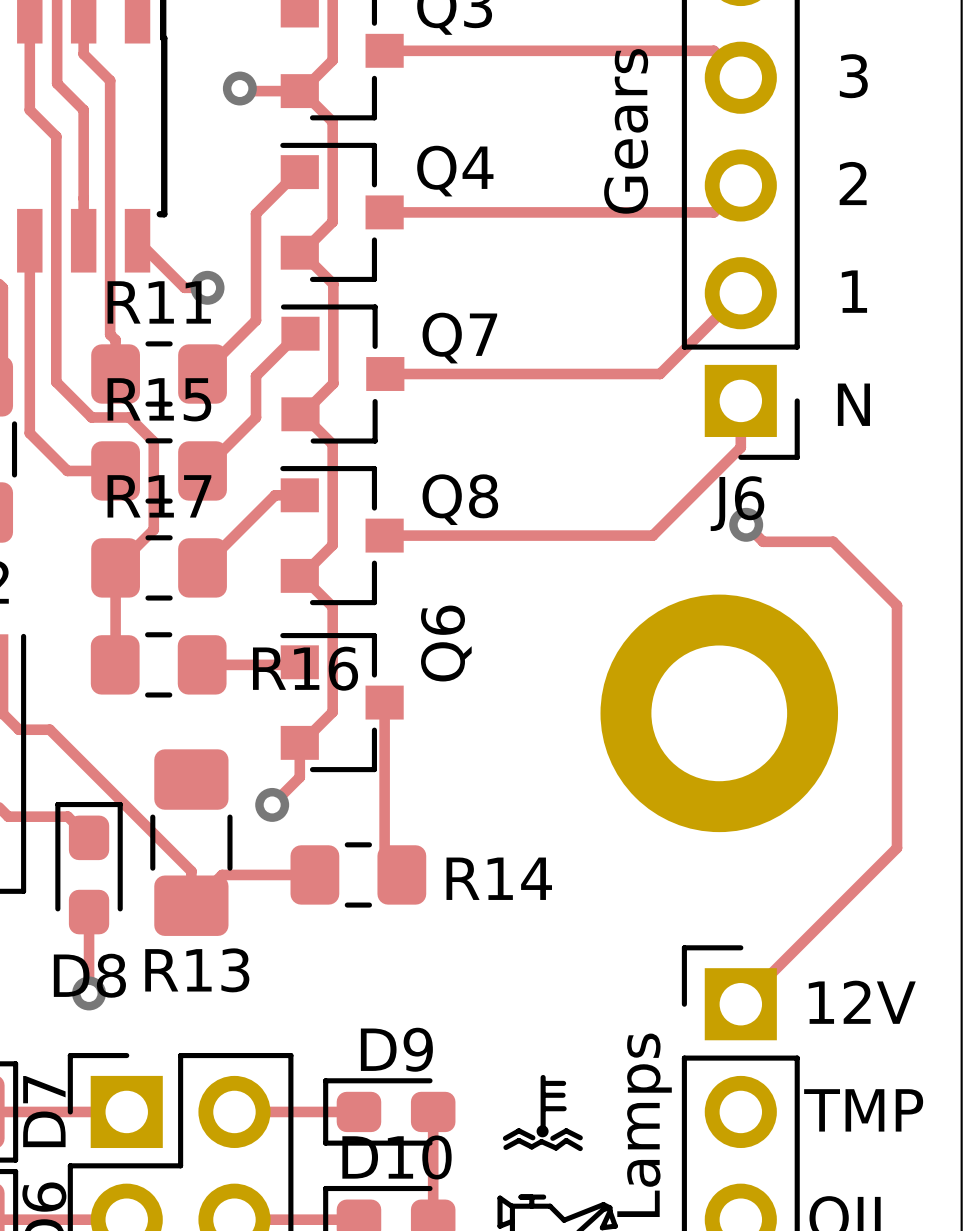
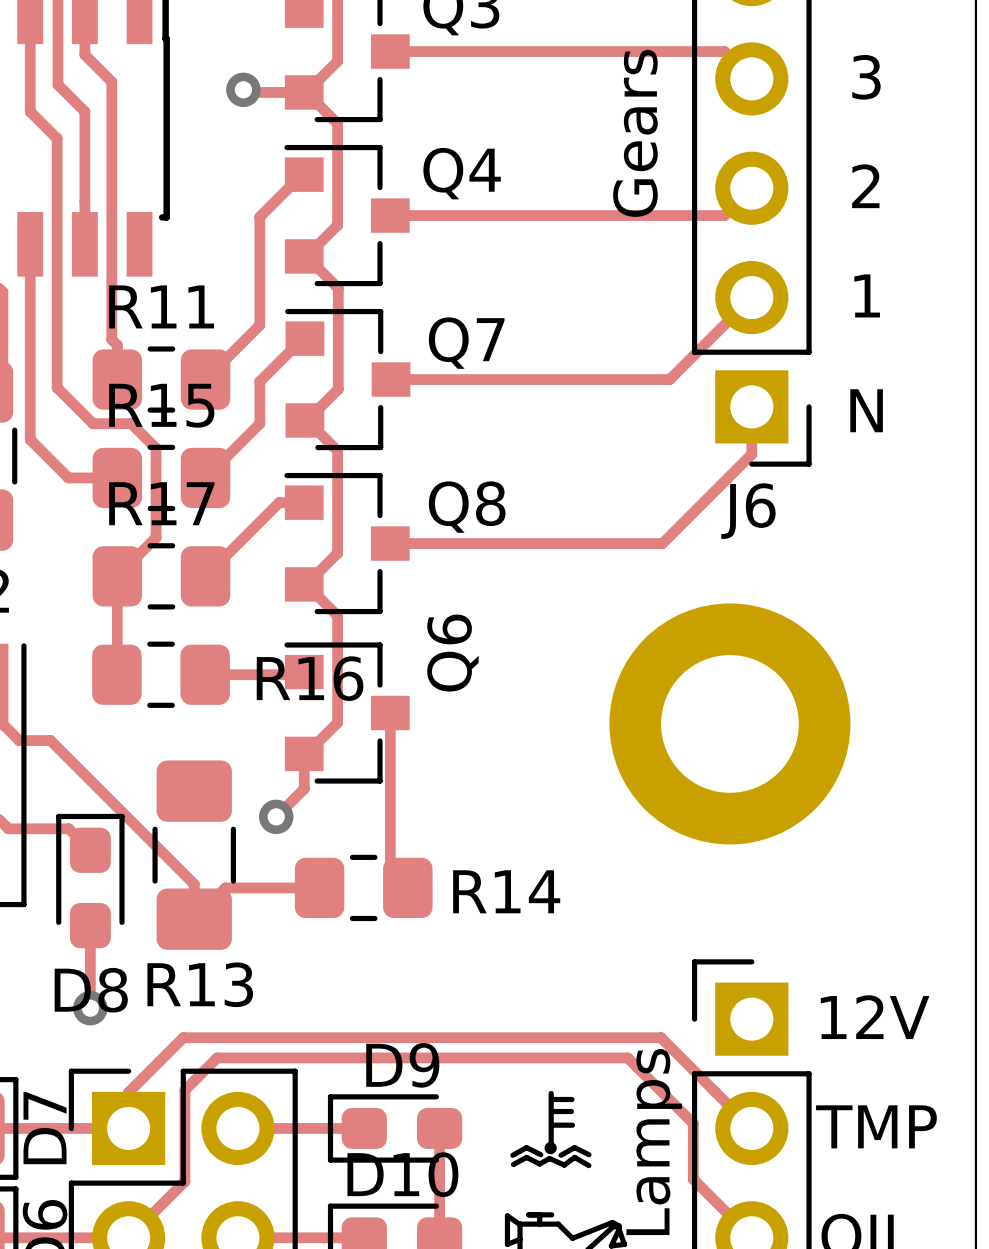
track: (137, 240) (184, 287) (207, 287) -> none
via: (207, 287) -> none
track: (746, 524) (763, 541) (833, 541) (897, 605) (897, 848) (740, 1004) -> none
via: (746, 524) -> none
track: none -> (128, 1128) (128, 1092) (183, 1037) (661, 1037) (751, 1128)
track: none -> (128, 1237) (184, 1181) (184, 1090) (217, 1057) (627, 1057) (693, 1123) (693, 1179) (751, 1237)

